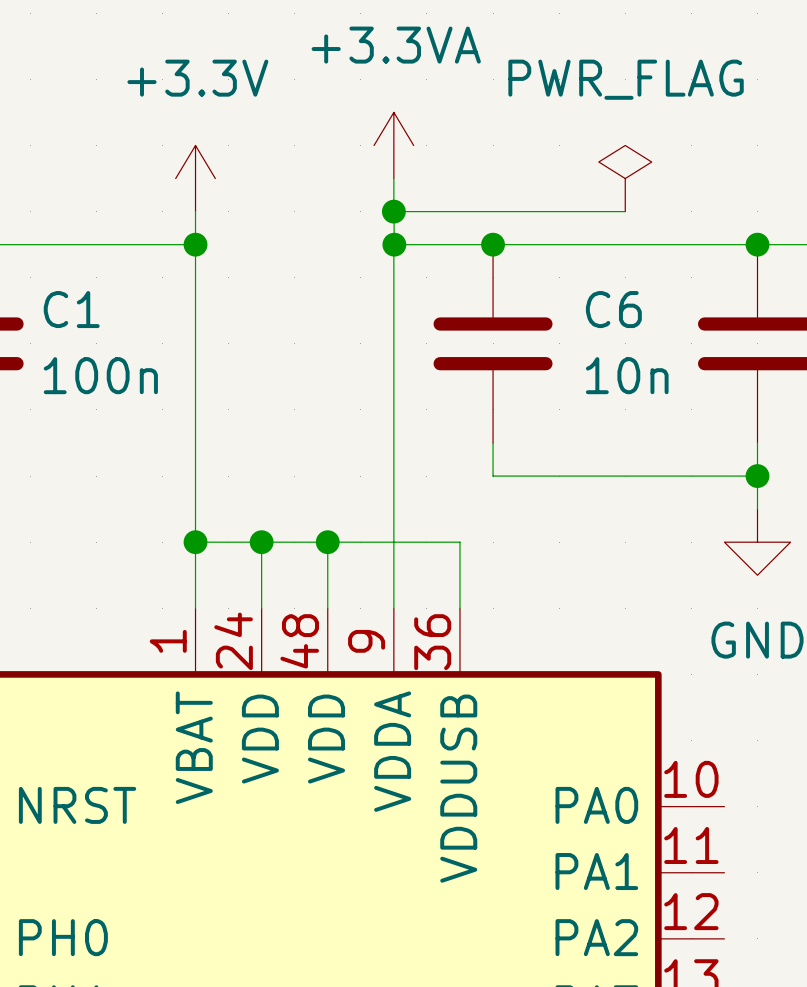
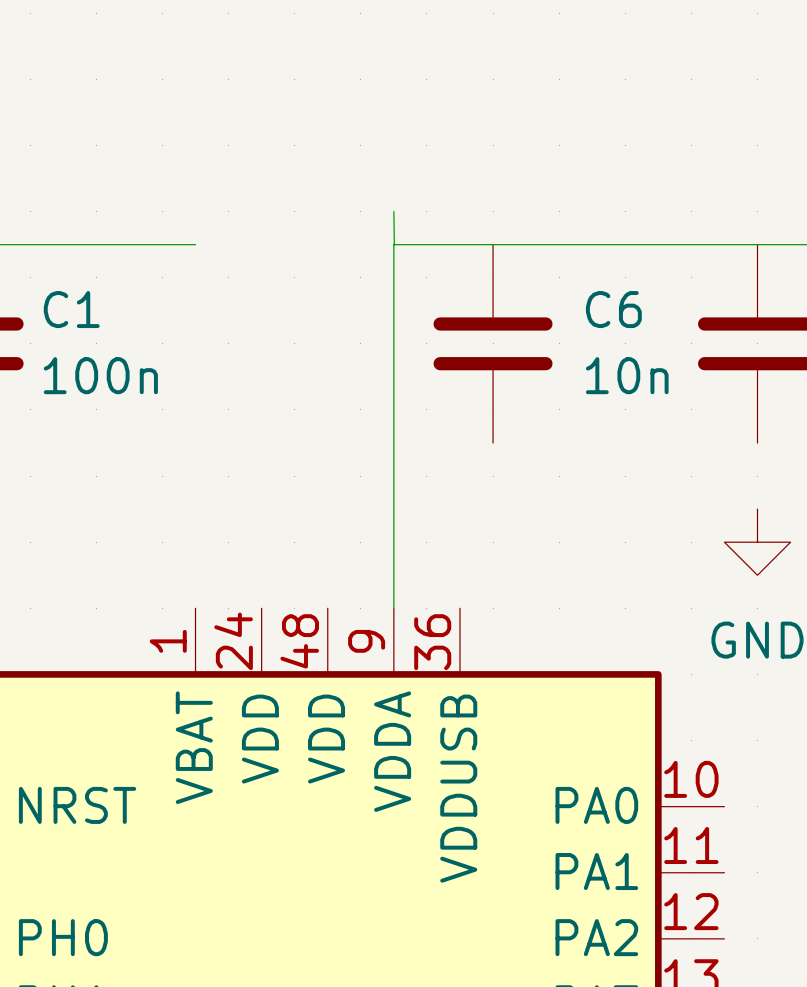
power symbol: +3.3VA (393, 145) -> none
power symbol: +3.3V (195, 178) -> none
wire: (393, 178) (393, 211) (625, 211) -> none
power symbol: PWR_FLAG (625, 178) -> none
wire: (195, 211) (195, 608) -> none
junction: (393, 211) -> none
junction: (195, 244) -> none
junction: (394, 244) -> none
junction: (493, 244) -> none
junction: (757, 244) -> none
wire: (493, 443) (493, 476) (757, 476) -> none
wire: (757, 443) (757, 509) -> none
junction: (757, 476) -> none
wire: (195, 542) (459, 542) (459, 608) -> none
junction: (195, 542) -> none
wire: (261, 542) (261, 608) -> none
junction: (261, 542) -> none
wire: (327, 542) (327, 608) -> none
junction: (327, 542) -> none

